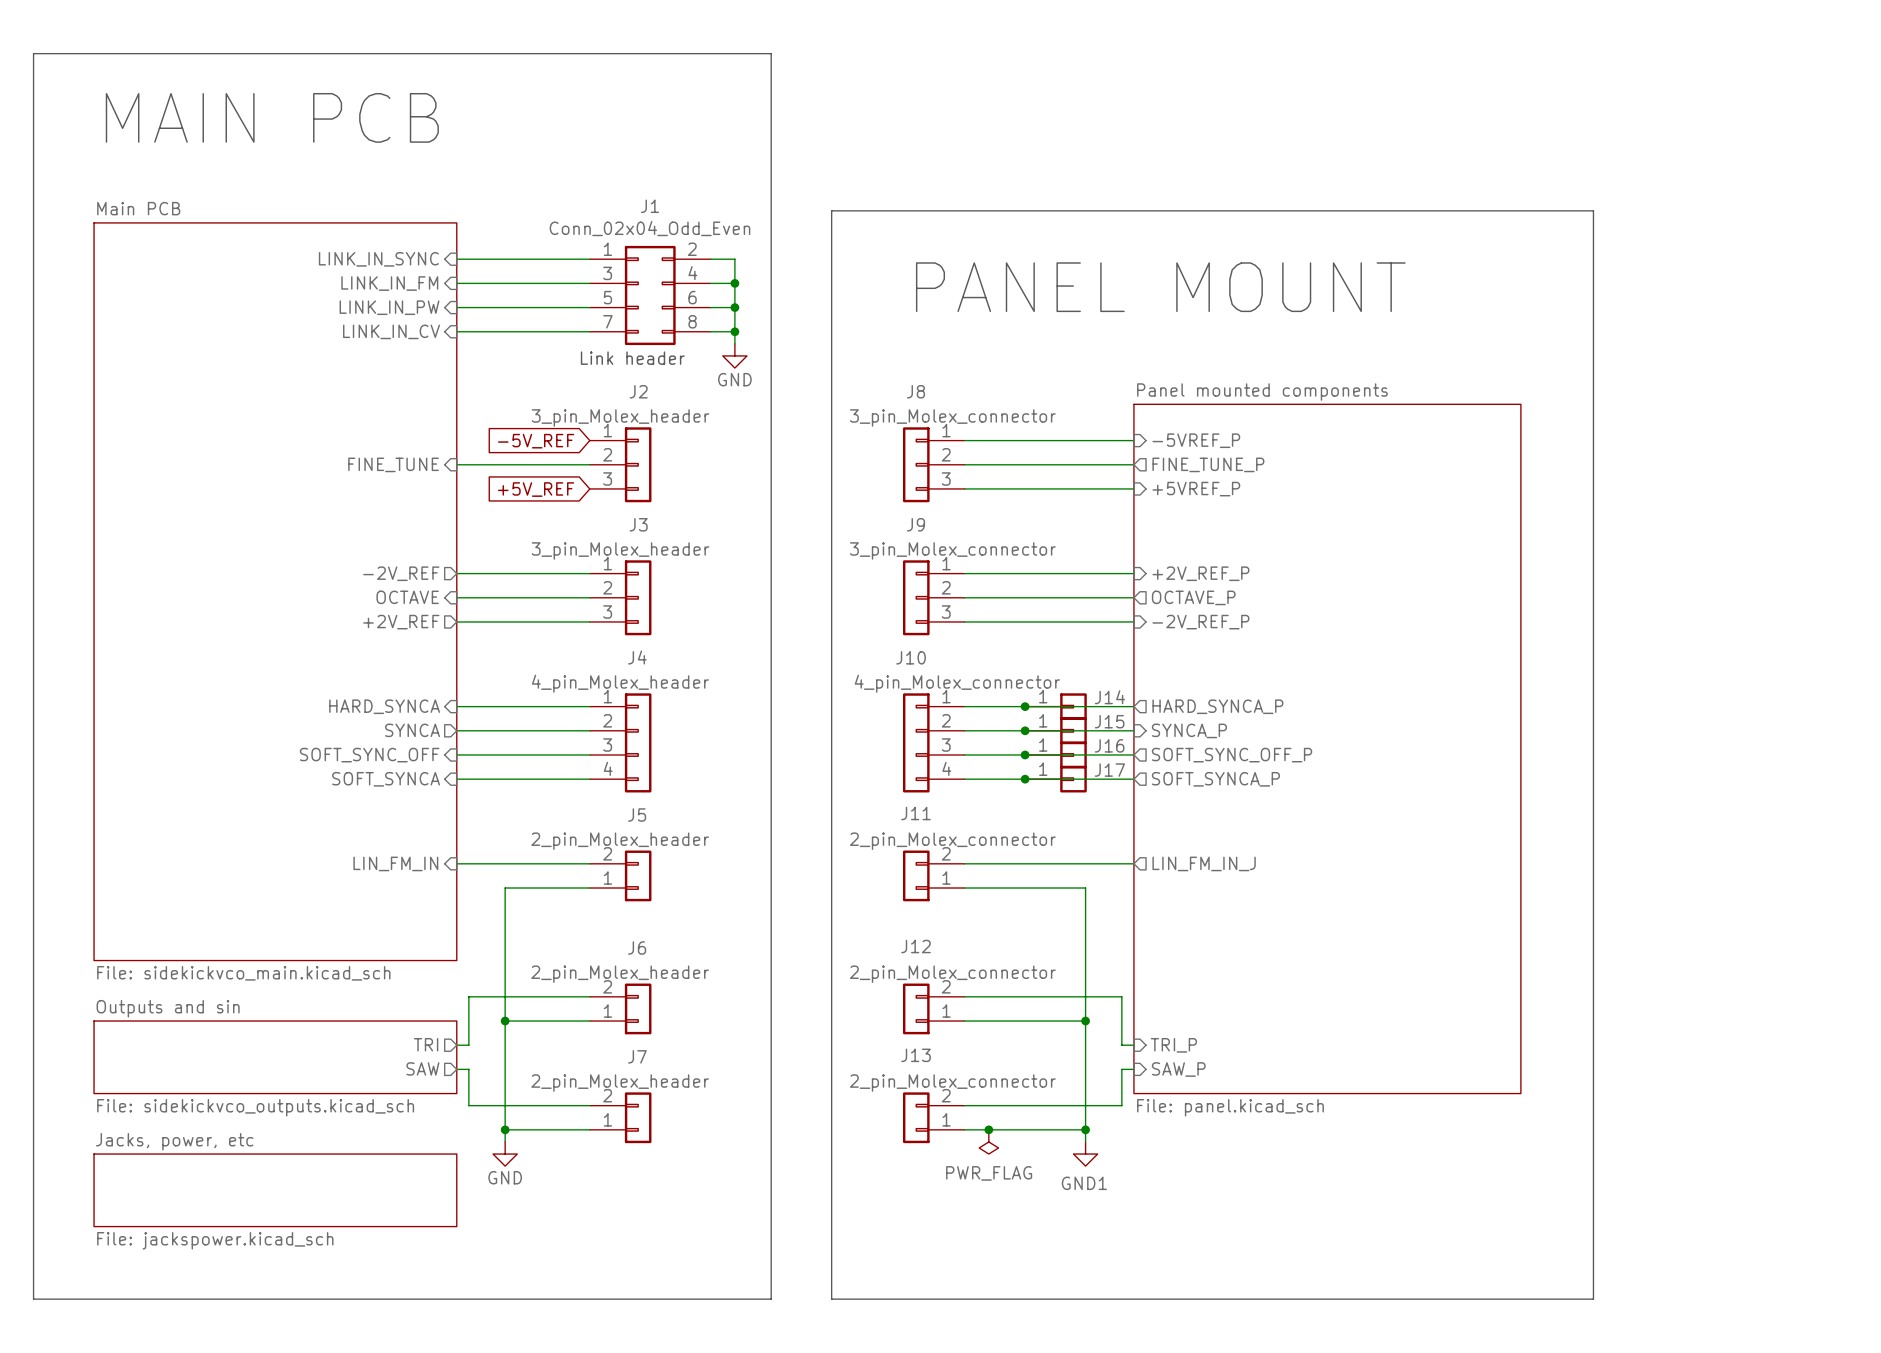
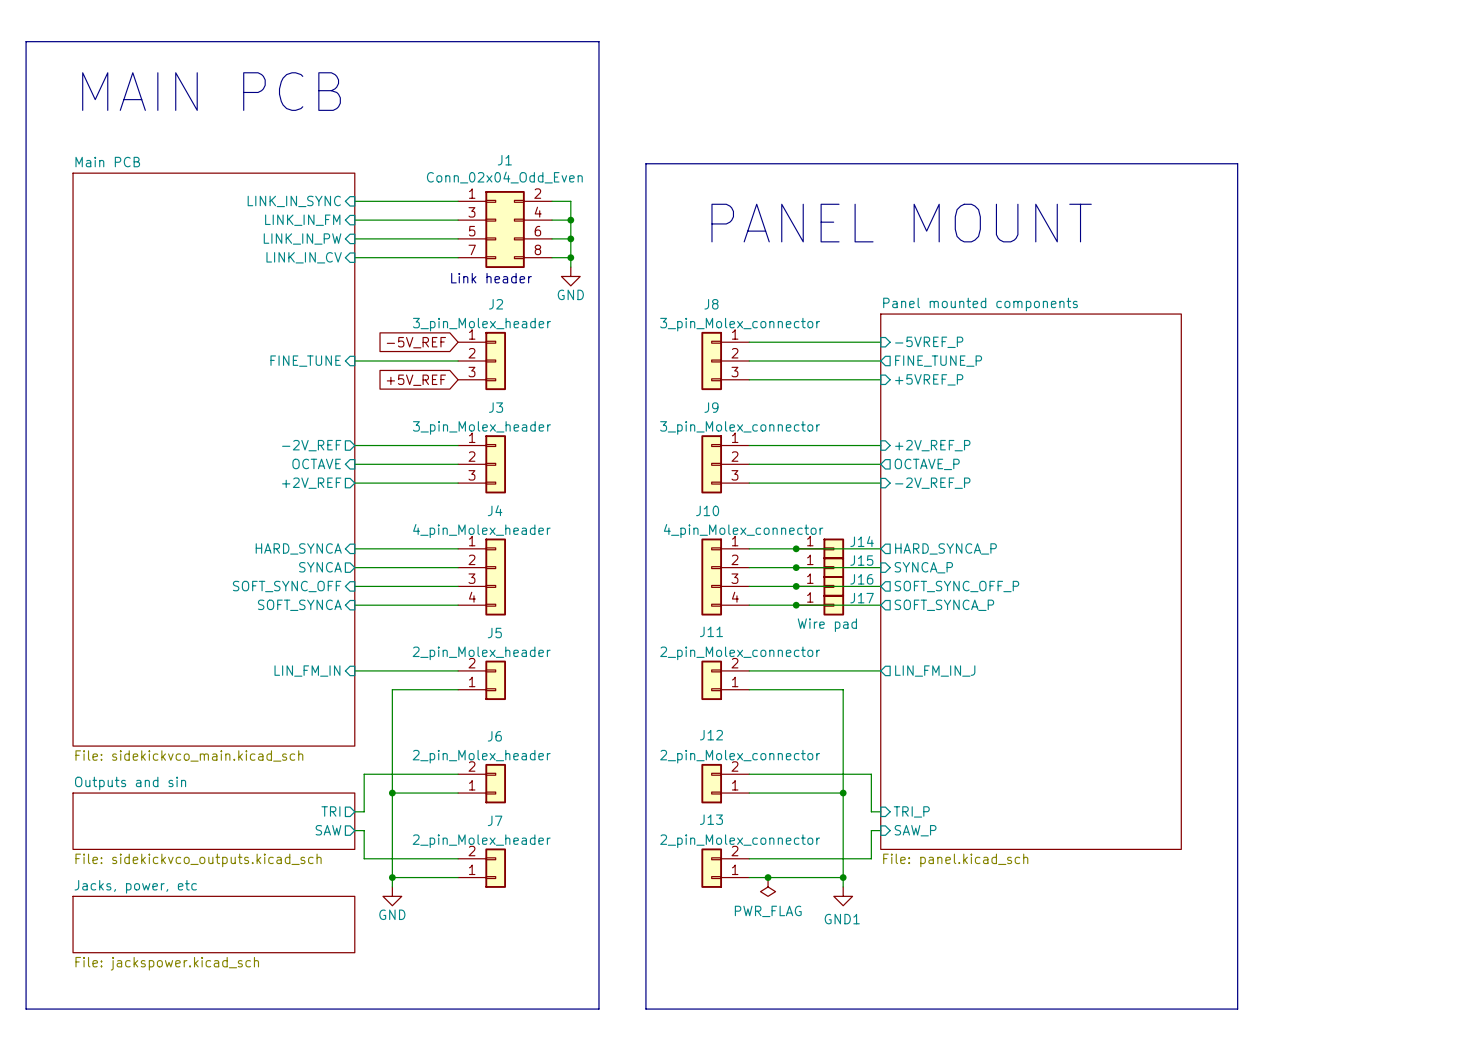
J14 value: none -> Wire pad (827, 625)

